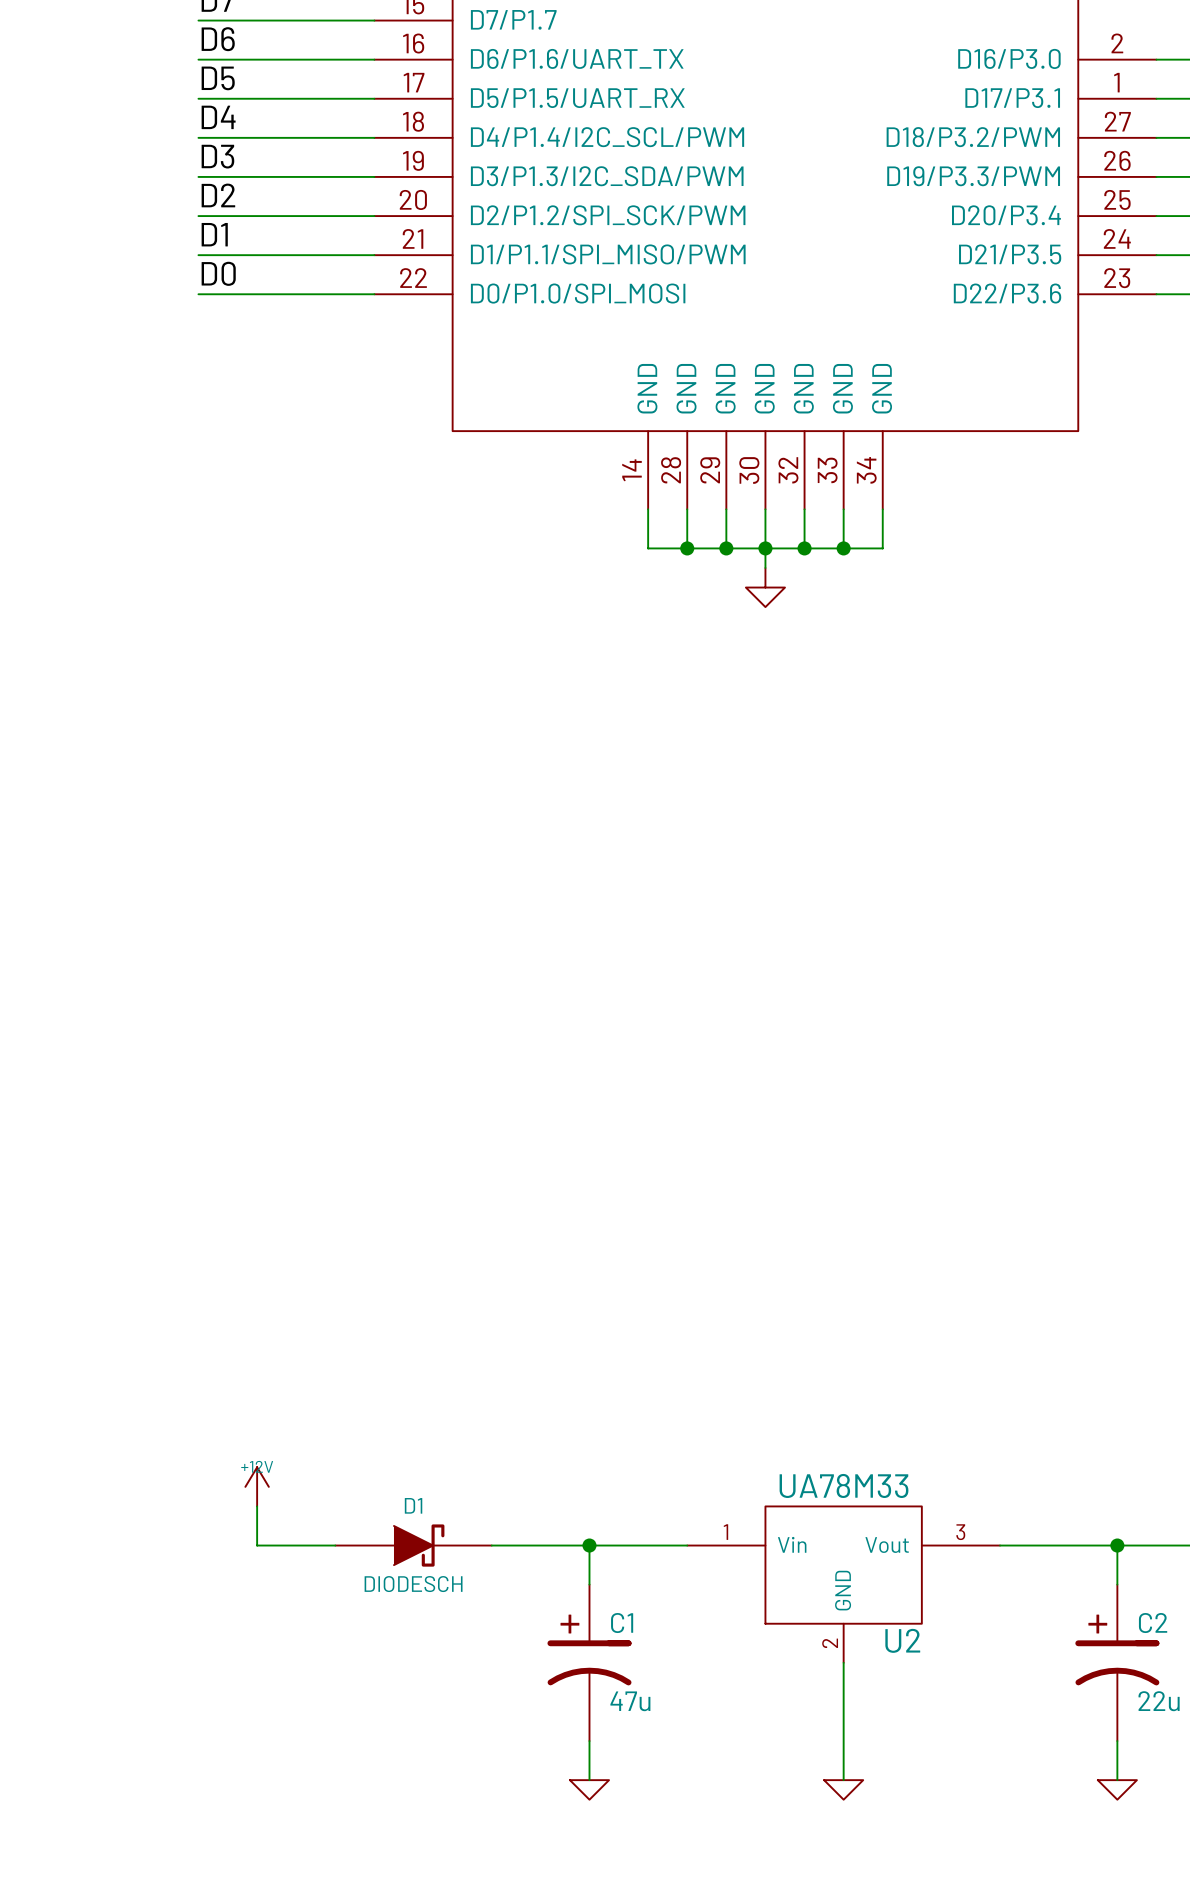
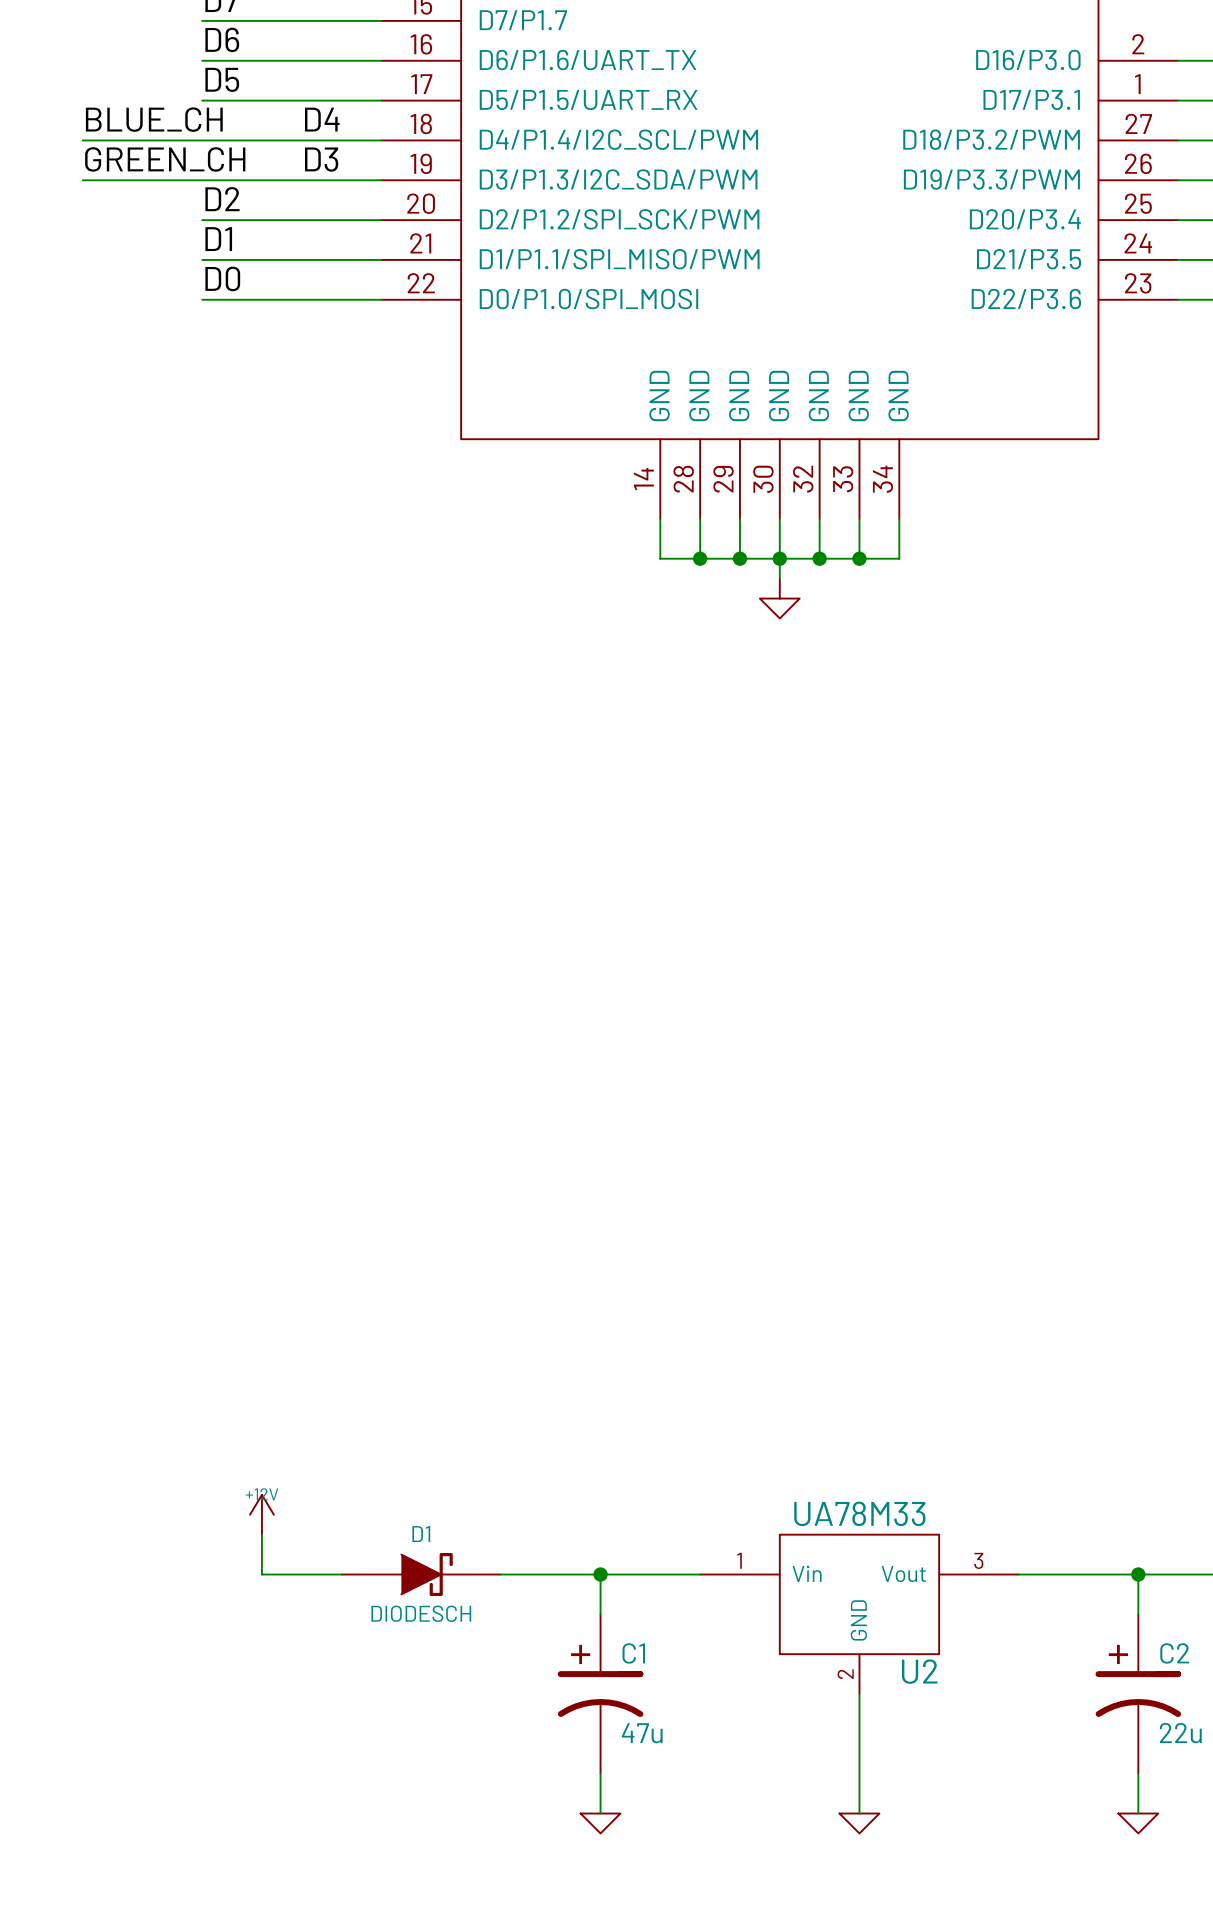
label: none -> BLUE_CH (154, 119)
label position: D4 (218, 117) -> D4 (322, 119)
wire: none -> (82, 140) (202, 140)
label: none -> GREEN_CH (165, 159)
label position: D3 (217, 156) -> D3 (321, 159)
wire: none -> (82, 180) (202, 180)

